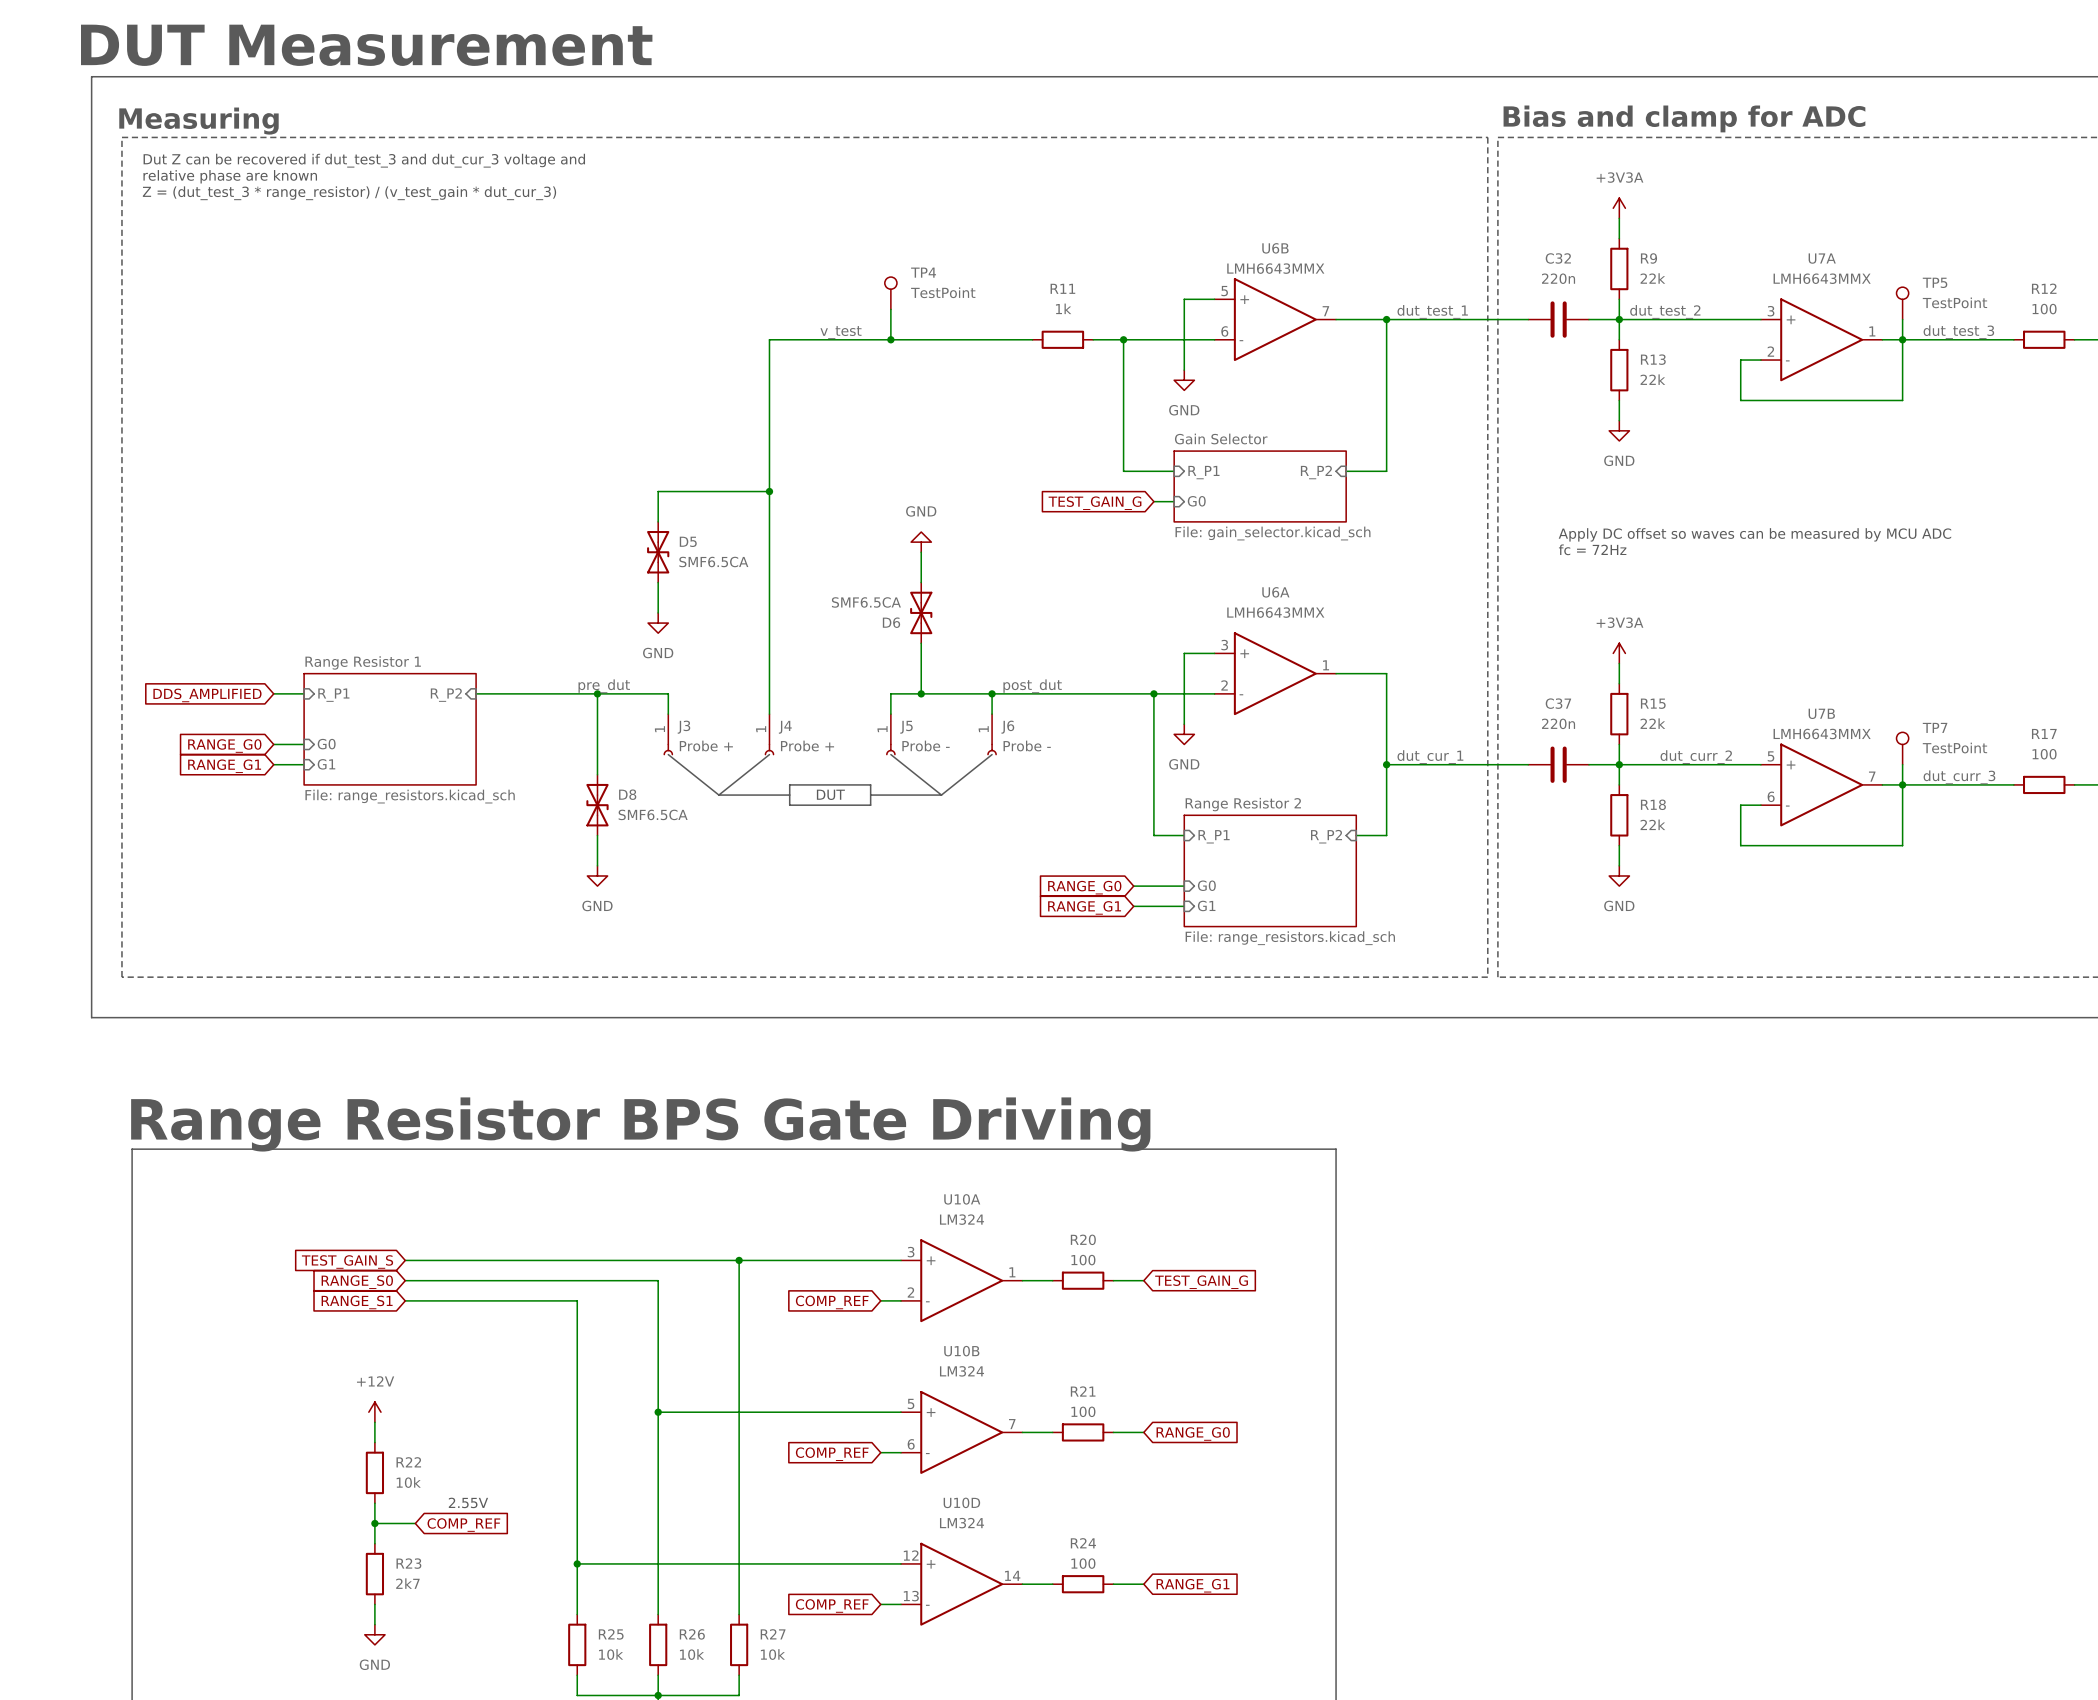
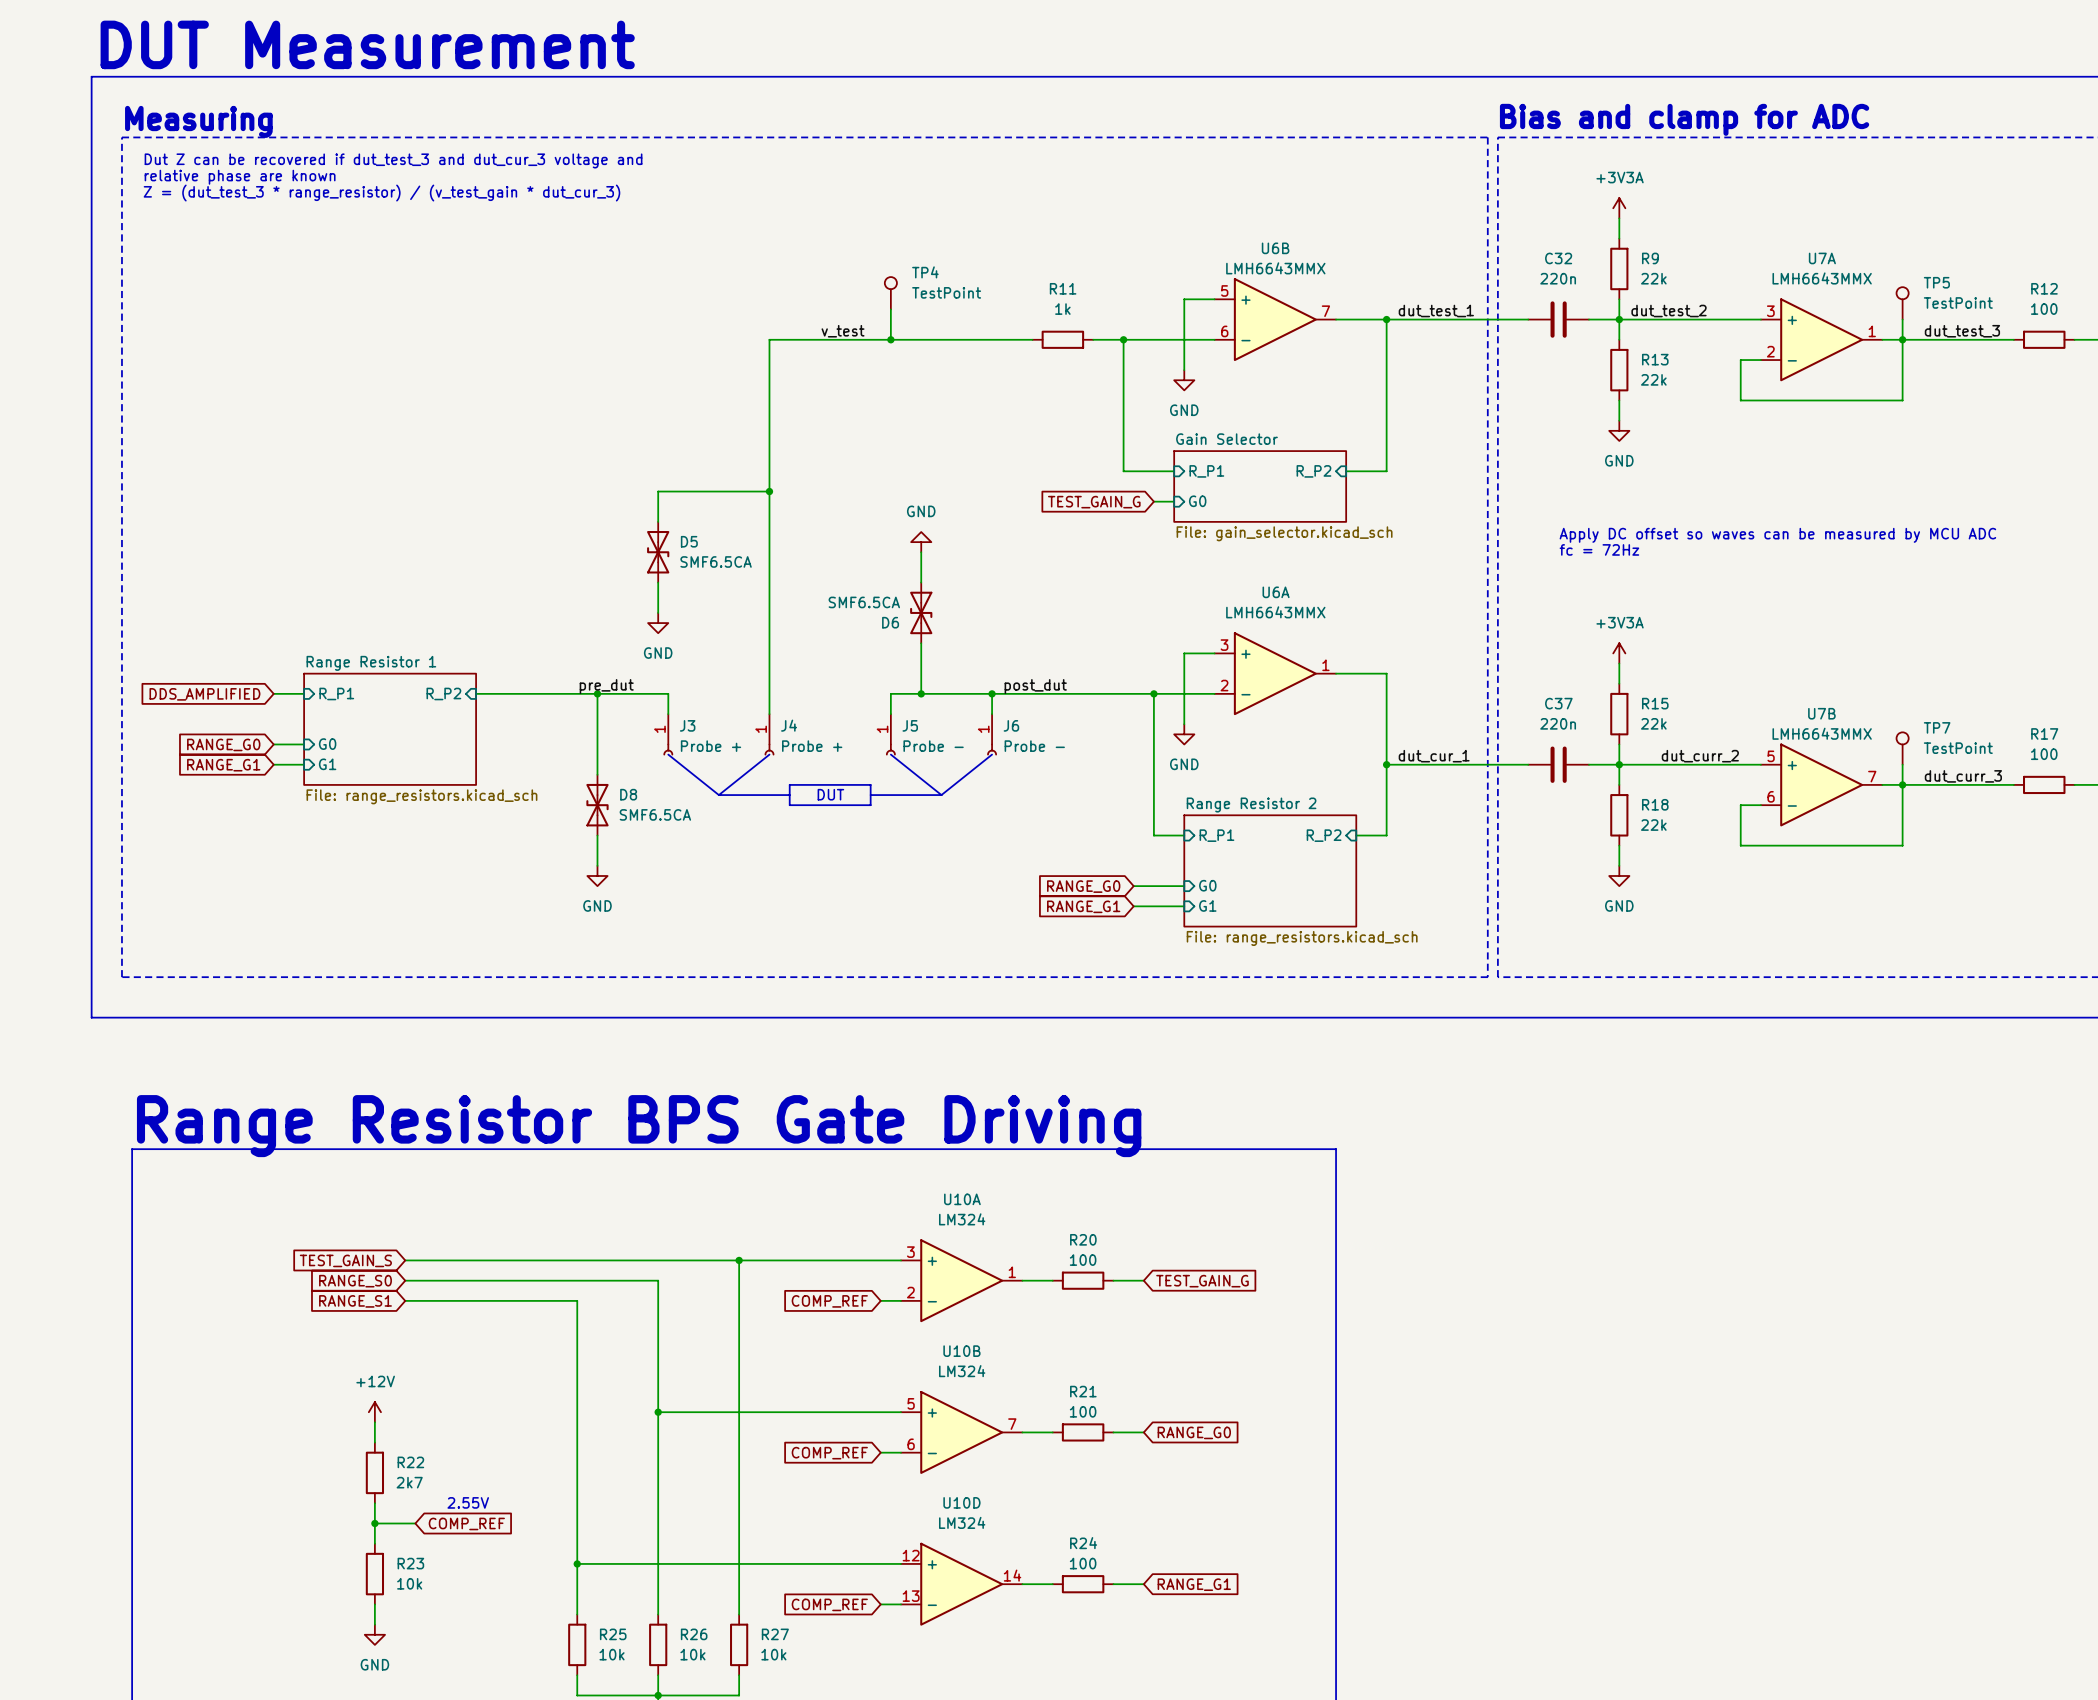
R22 value: 10k (408, 1482) -> 2k7 (409, 1482)
R23 value: 2k7 (407, 1583) -> 10k (409, 1583)

